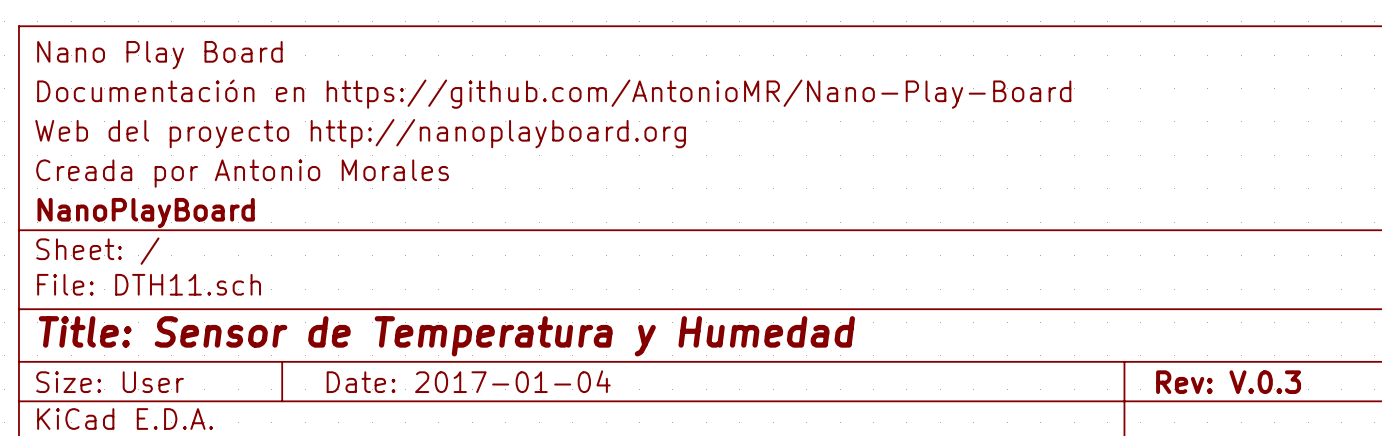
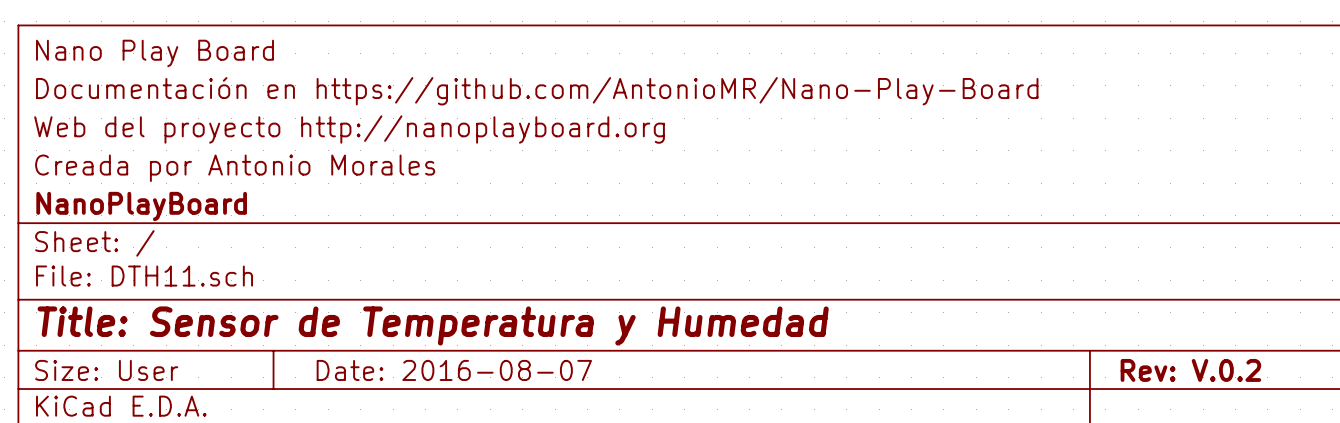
title block: Date: 2017-01-04 (468, 381) -> Date: 2016-08-07 (454, 370)
title block: Rev: V.0.3 (1228, 382) -> Rev: V.0.2 (1190, 370)

